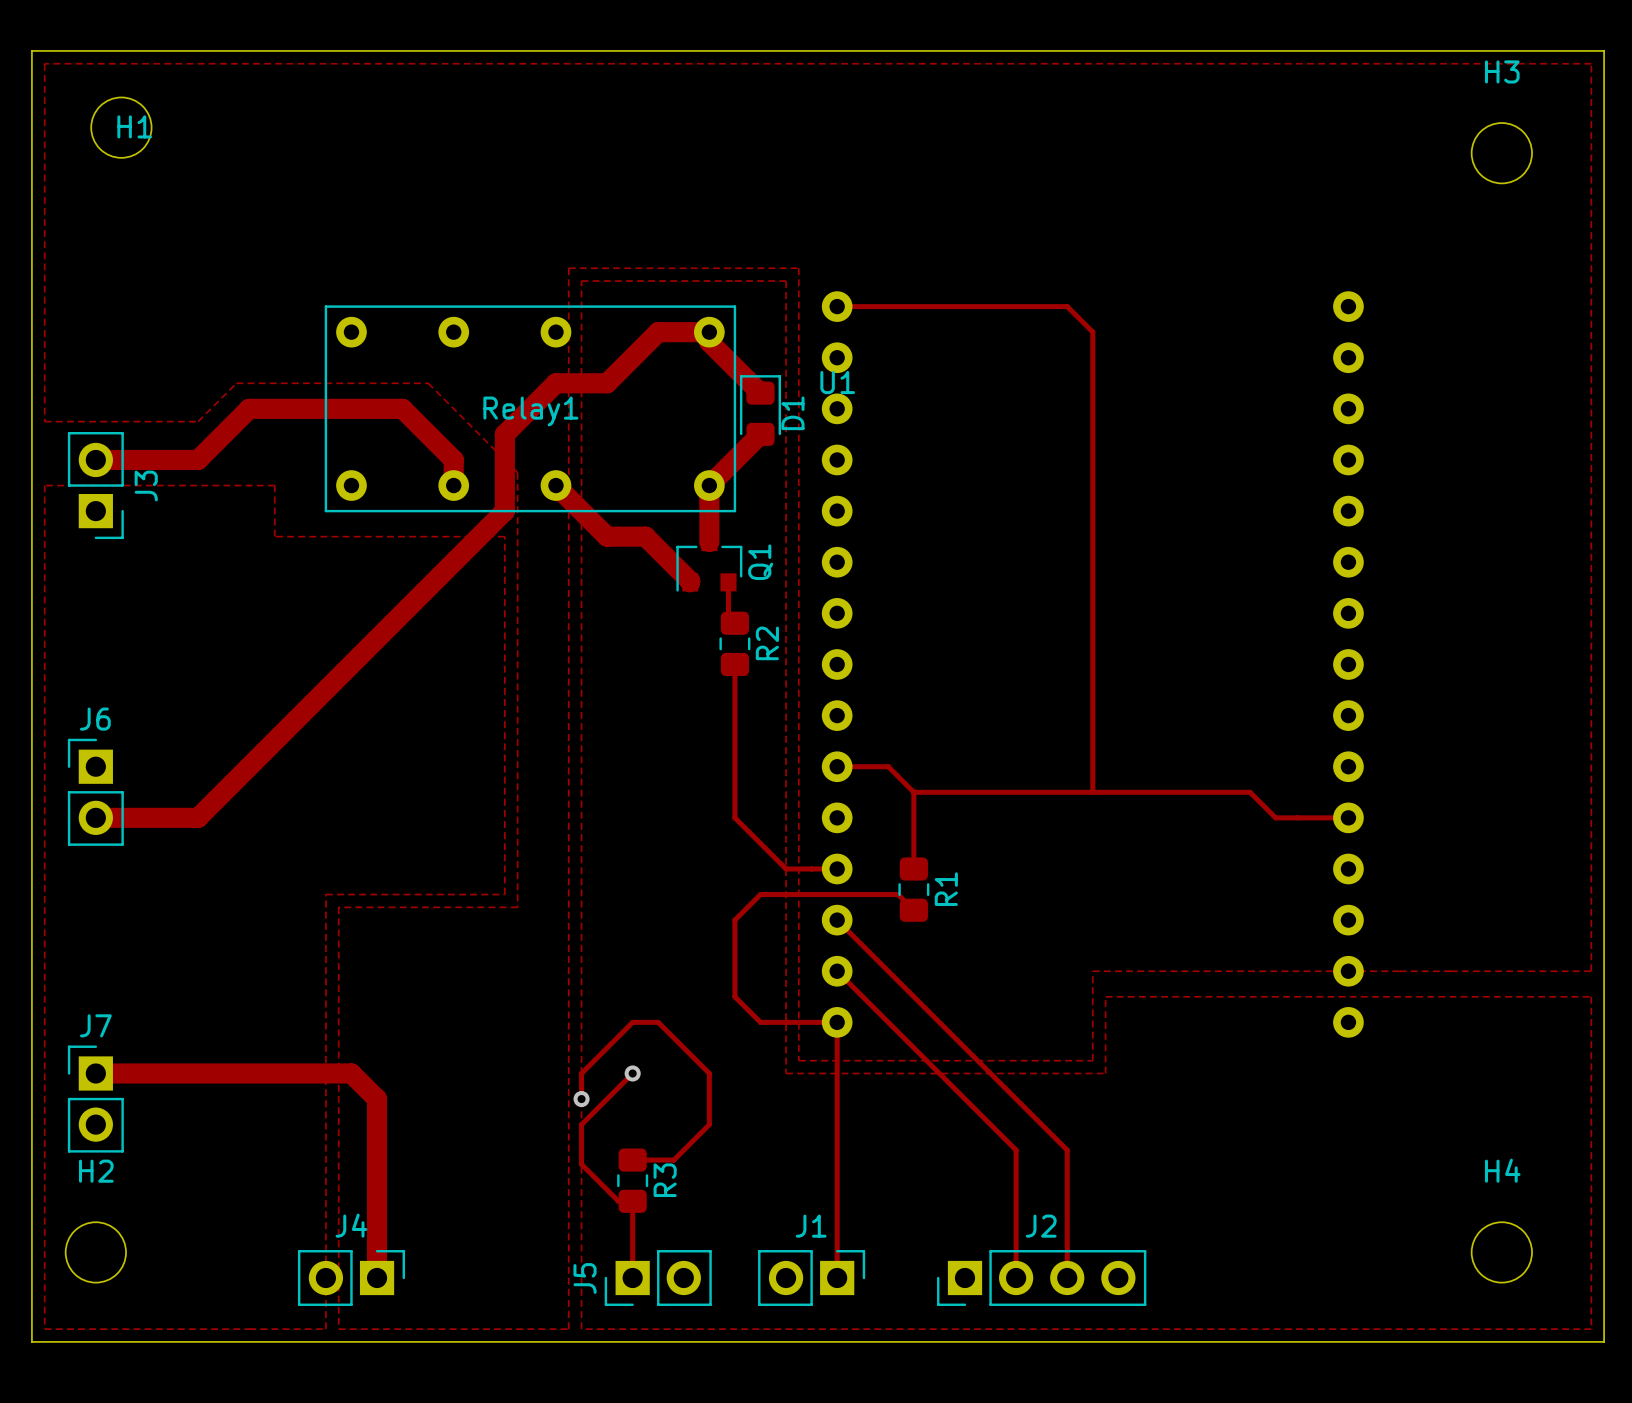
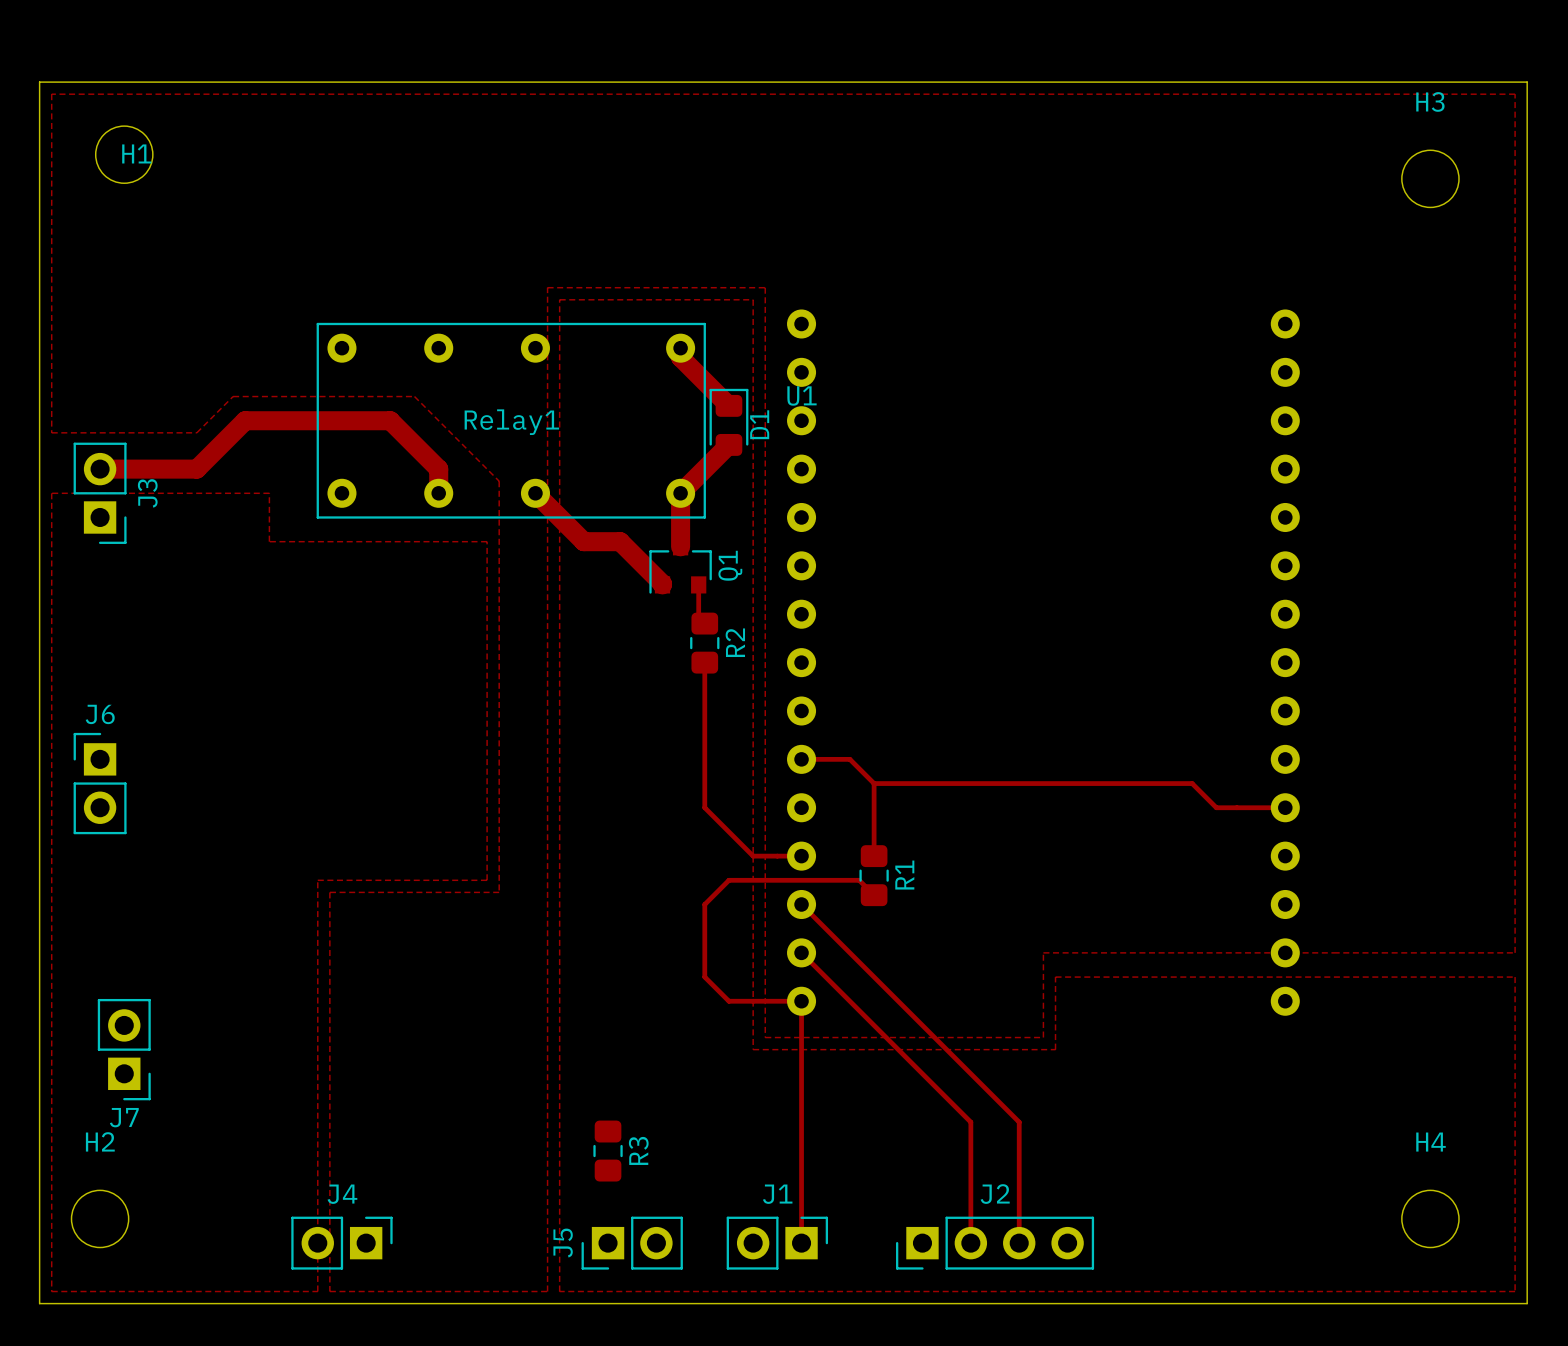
track: (837, 306) (1067, 306) (1092, 332) (1092, 792) -> none
track: (709, 332) (658, 332) (607, 383) (555, 383) (504, 434) (504, 511) (198, 817) (95, 817) -> none
track: (95, 1073) (351, 1073) (377, 1099) (377, 1278) -> none
track: (632, 1073) (581, 1124) (581, 1164) (618, 1201) (632, 1201) (632, 1278) -> none
via: (632, 1073) -> none
J7 rotation: 0° (95, 1099) -> 180° (124, 1049)
track: (581, 1099) (581, 1073) (632, 1022) (658, 1022) (709, 1073) (709, 1124) (673, 1160) (632, 1160) -> none
via: (581, 1099) -> none

